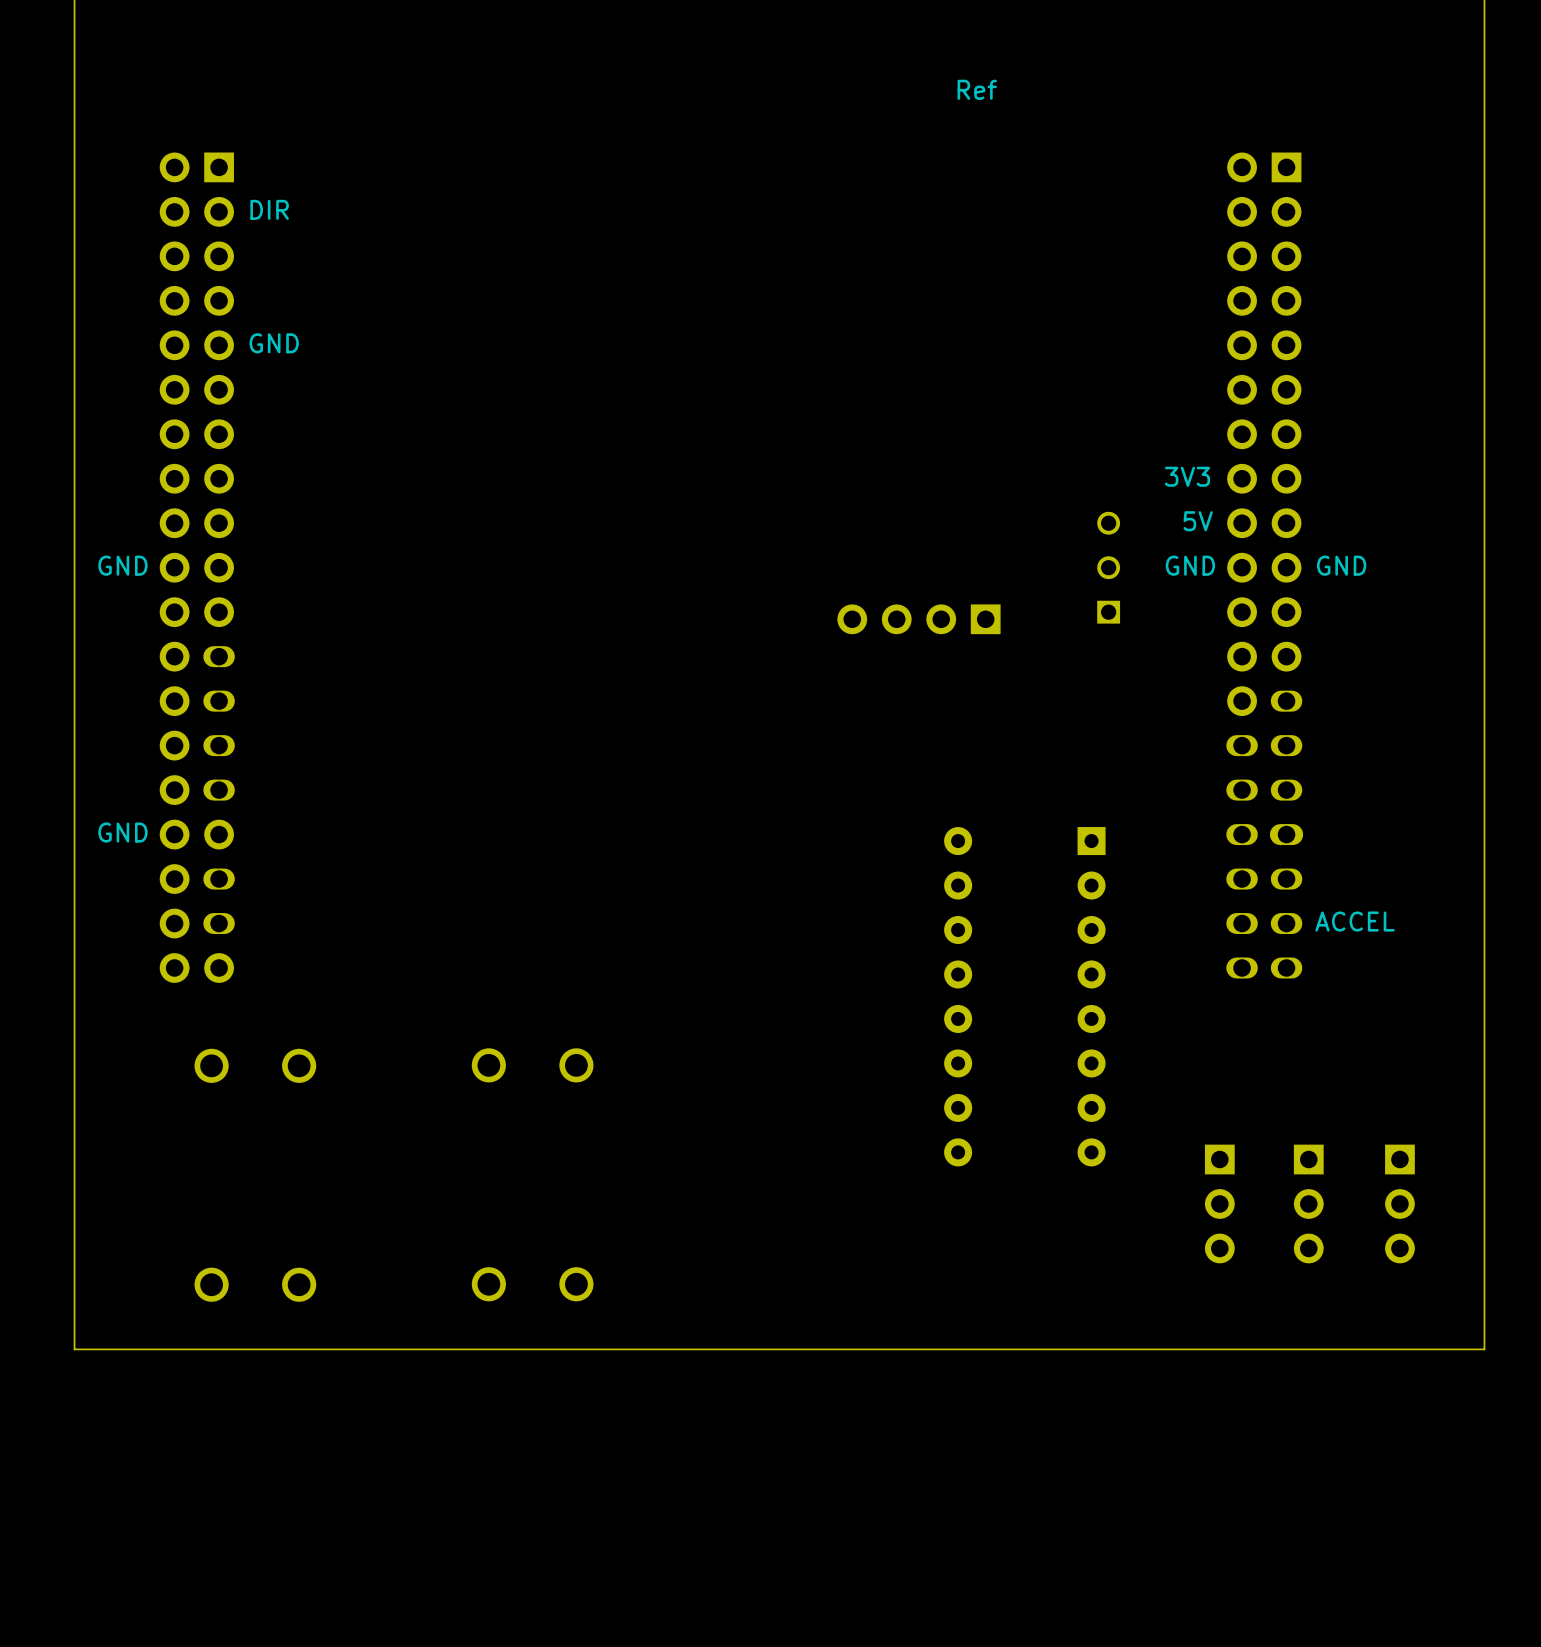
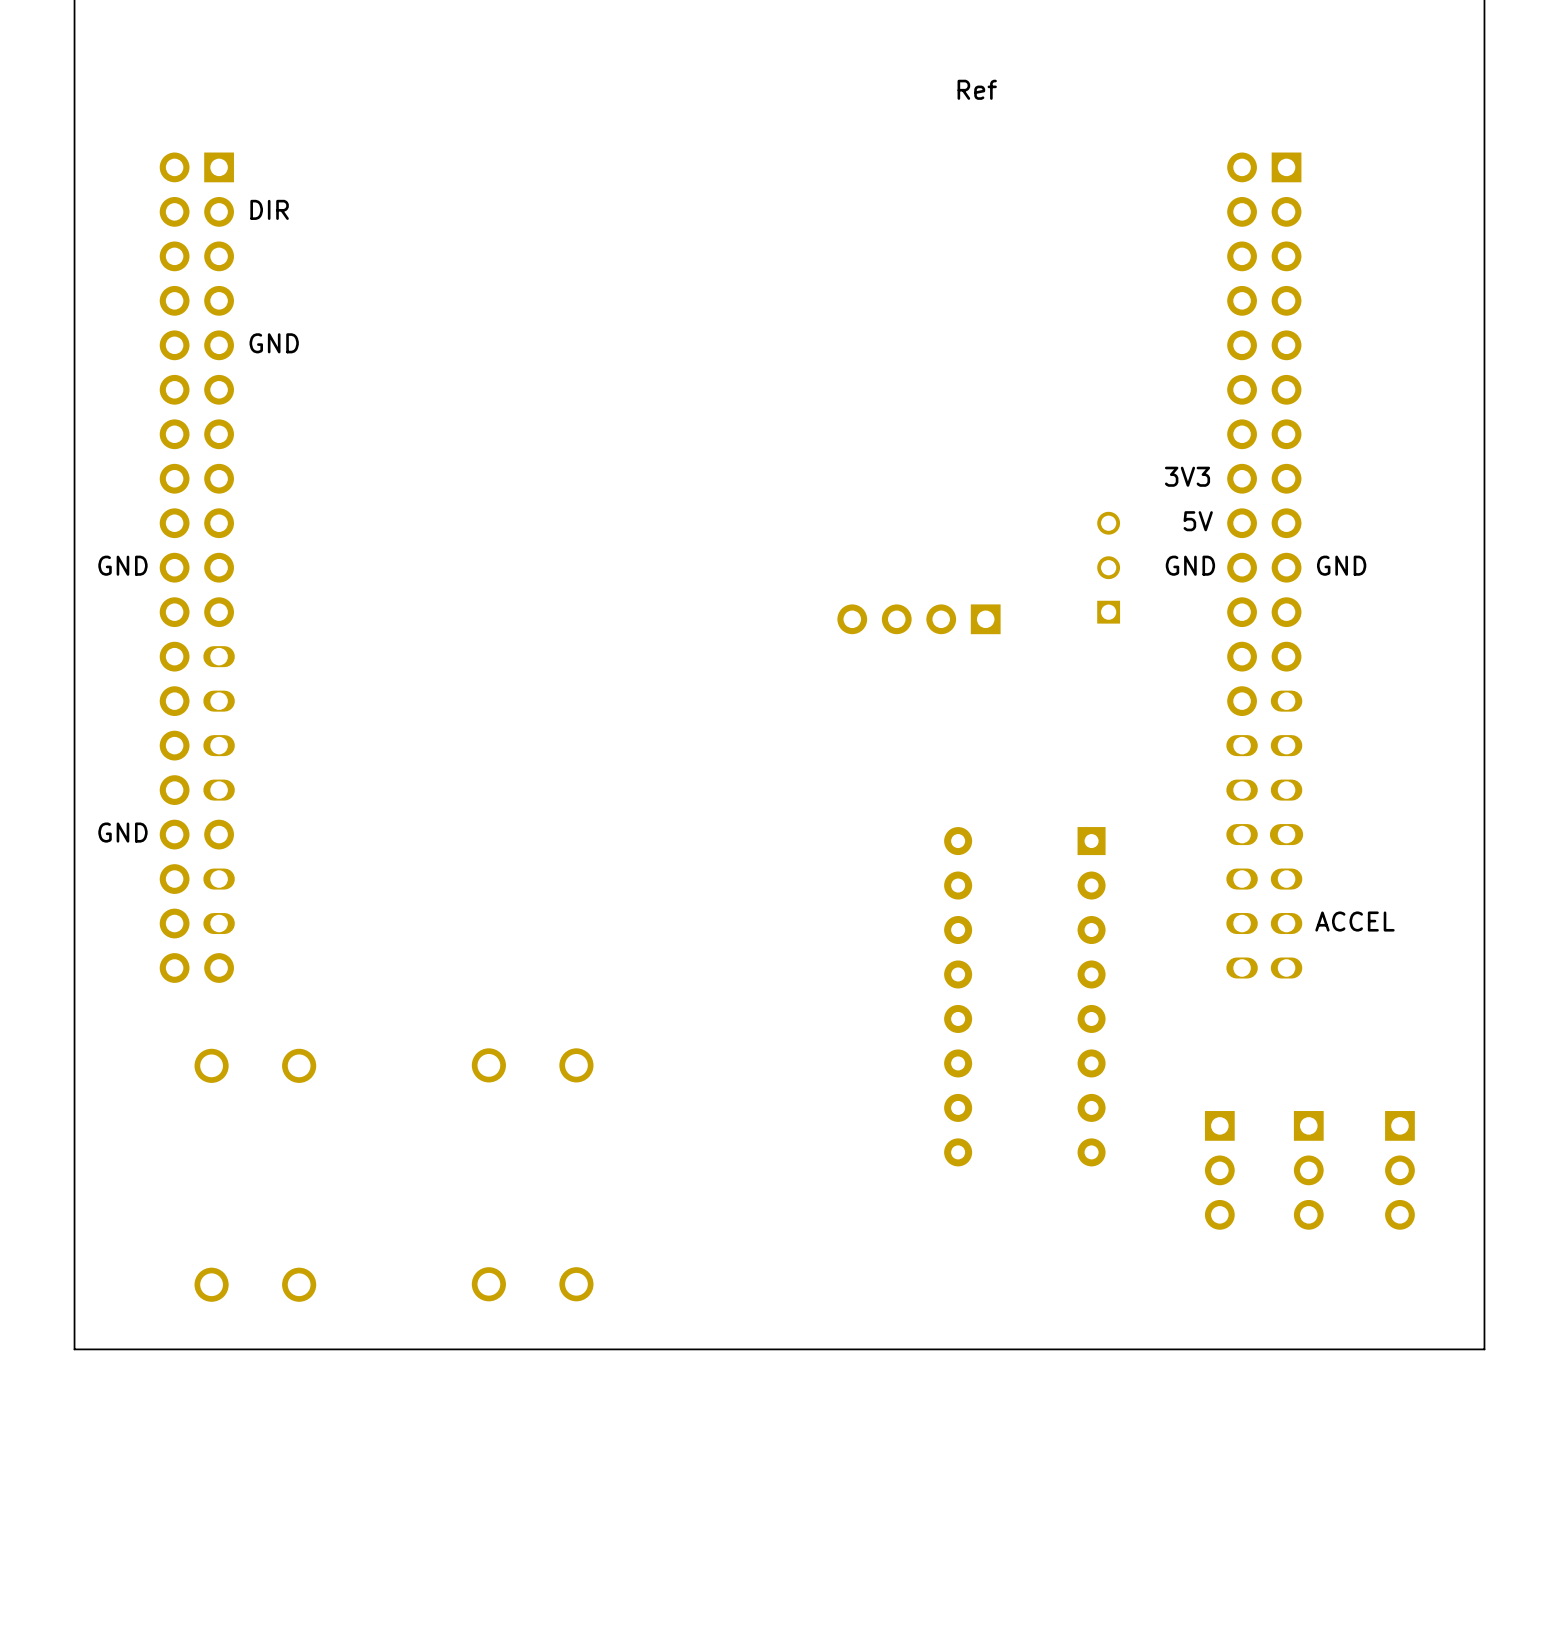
part position: (1219, 1203) -> (1219, 1170)
part position: (1308, 1203) -> (1308, 1170)
part position: (1399, 1203) -> (1399, 1170)

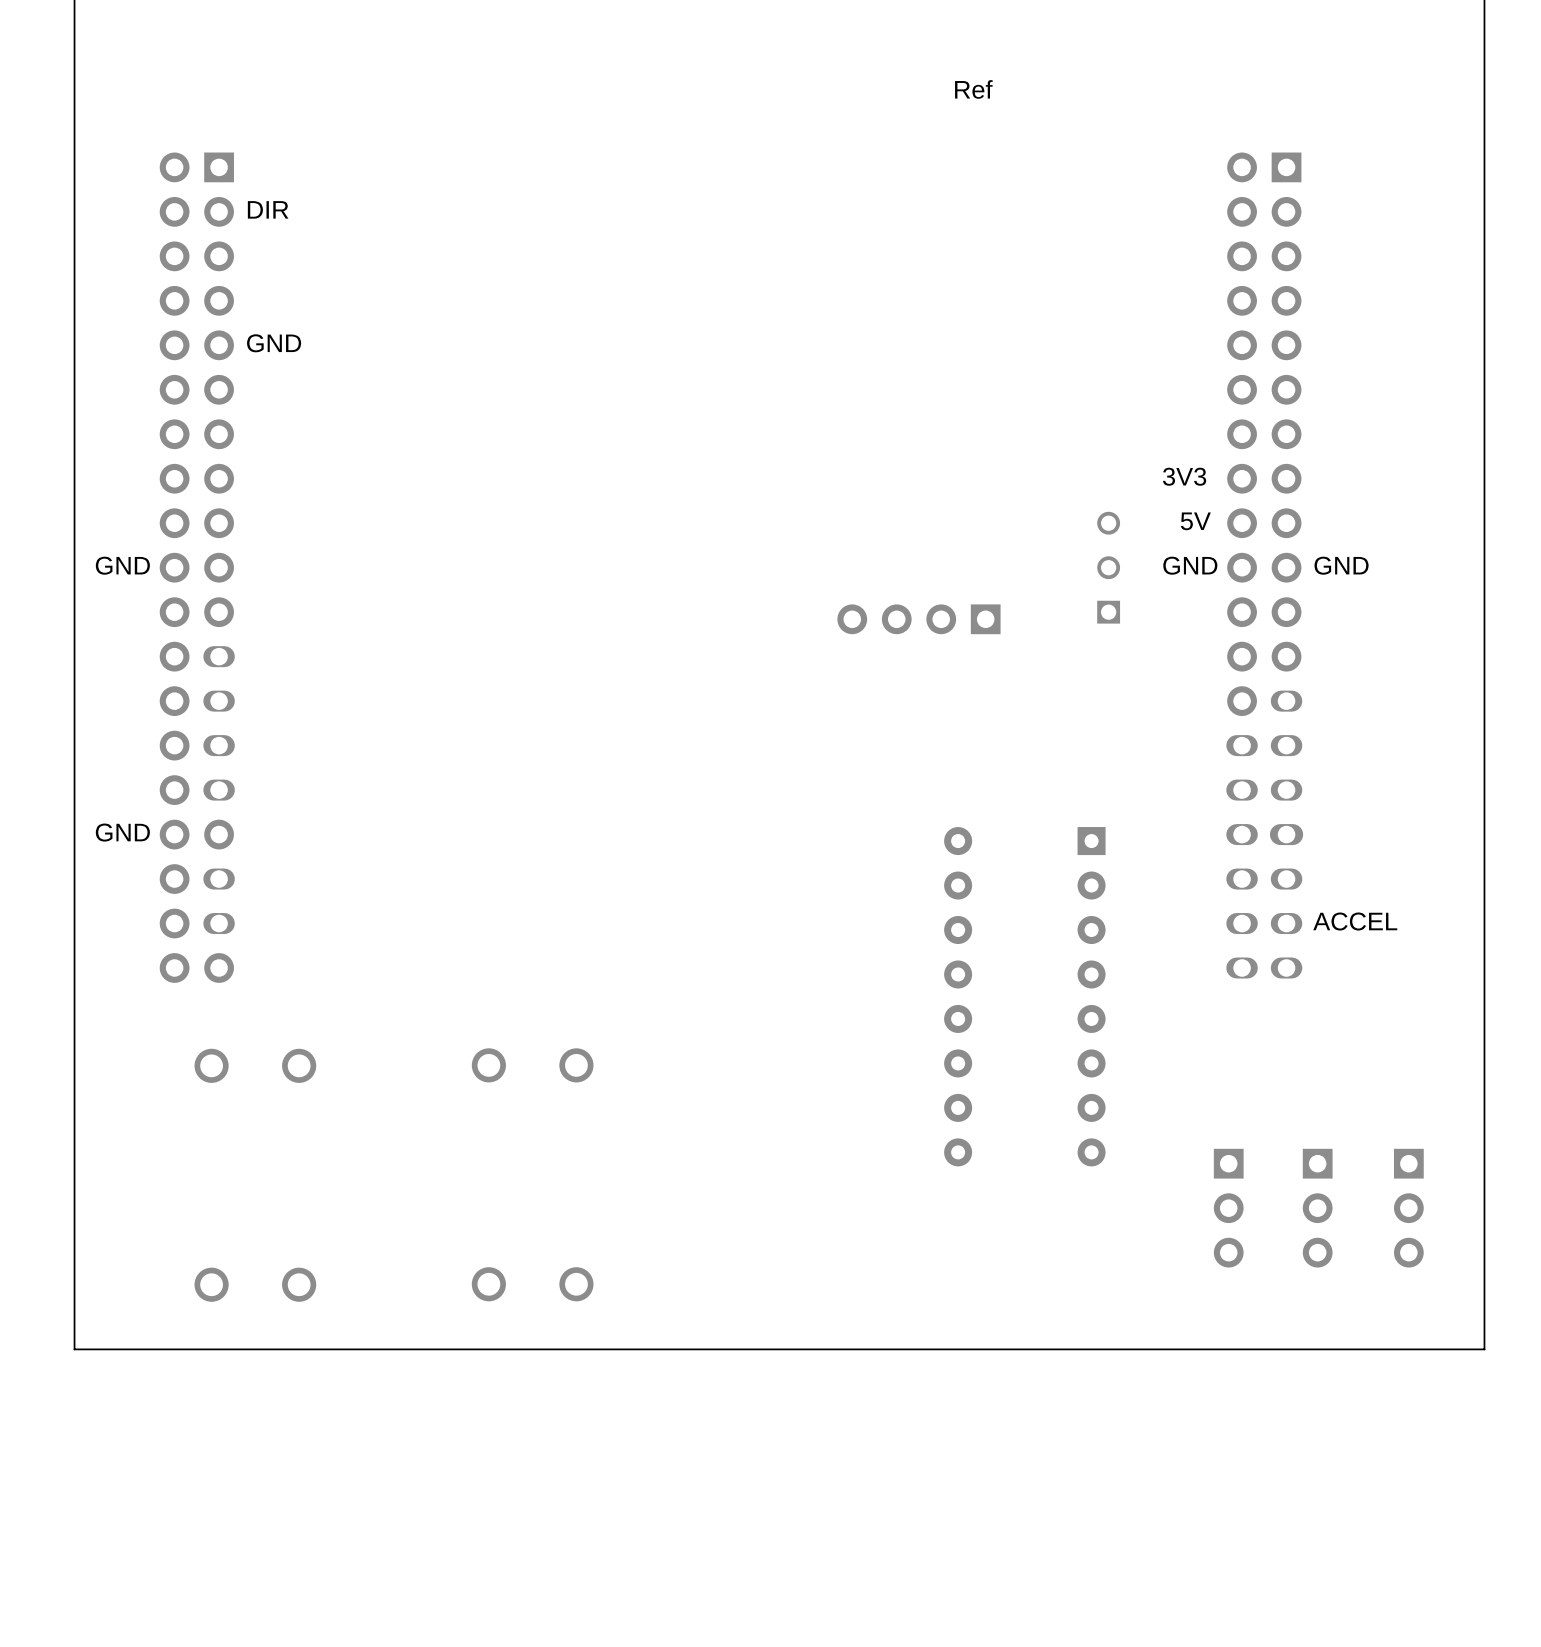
part position: (1219, 1170) -> (1228, 1208)
part position: (1308, 1170) -> (1317, 1208)
part position: (1399, 1170) -> (1408, 1208)

